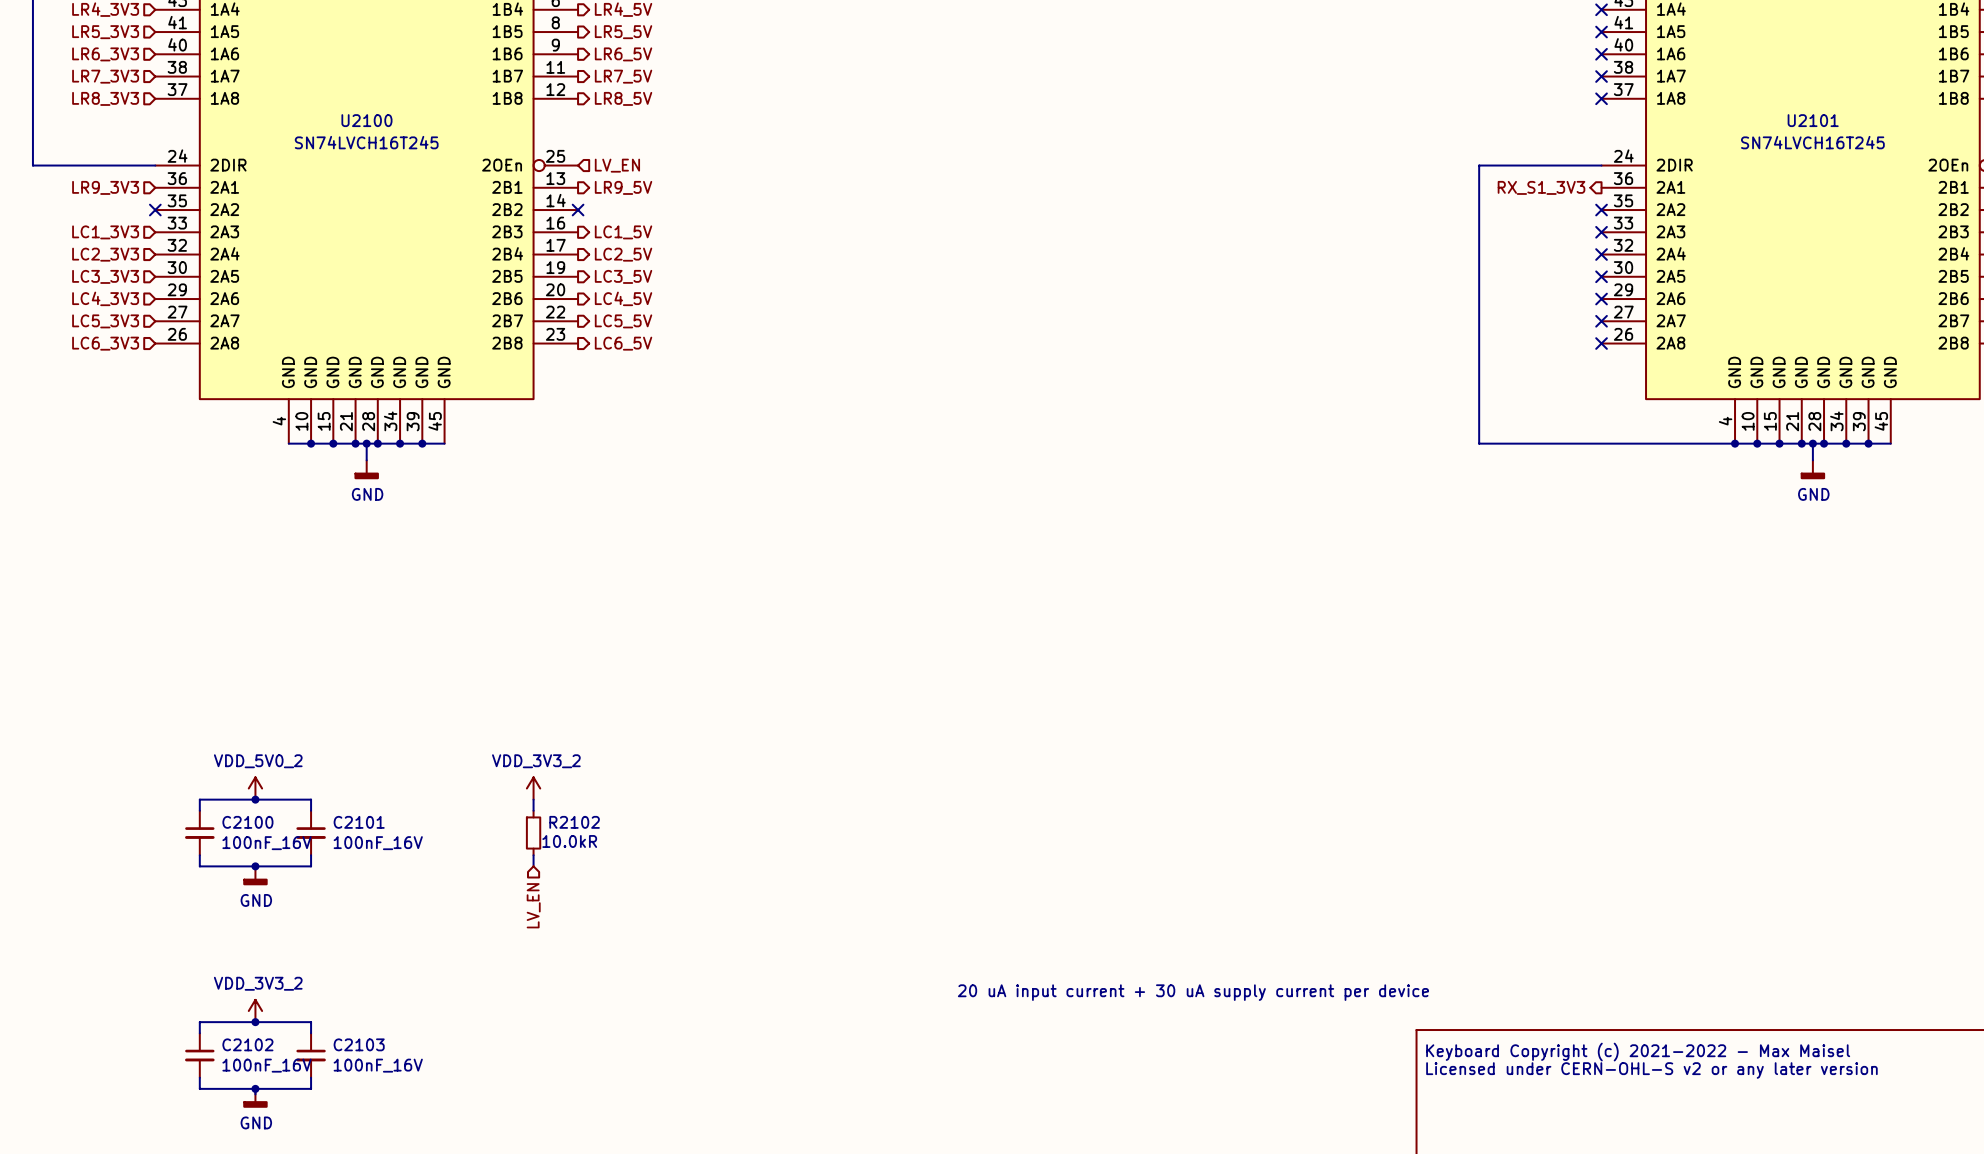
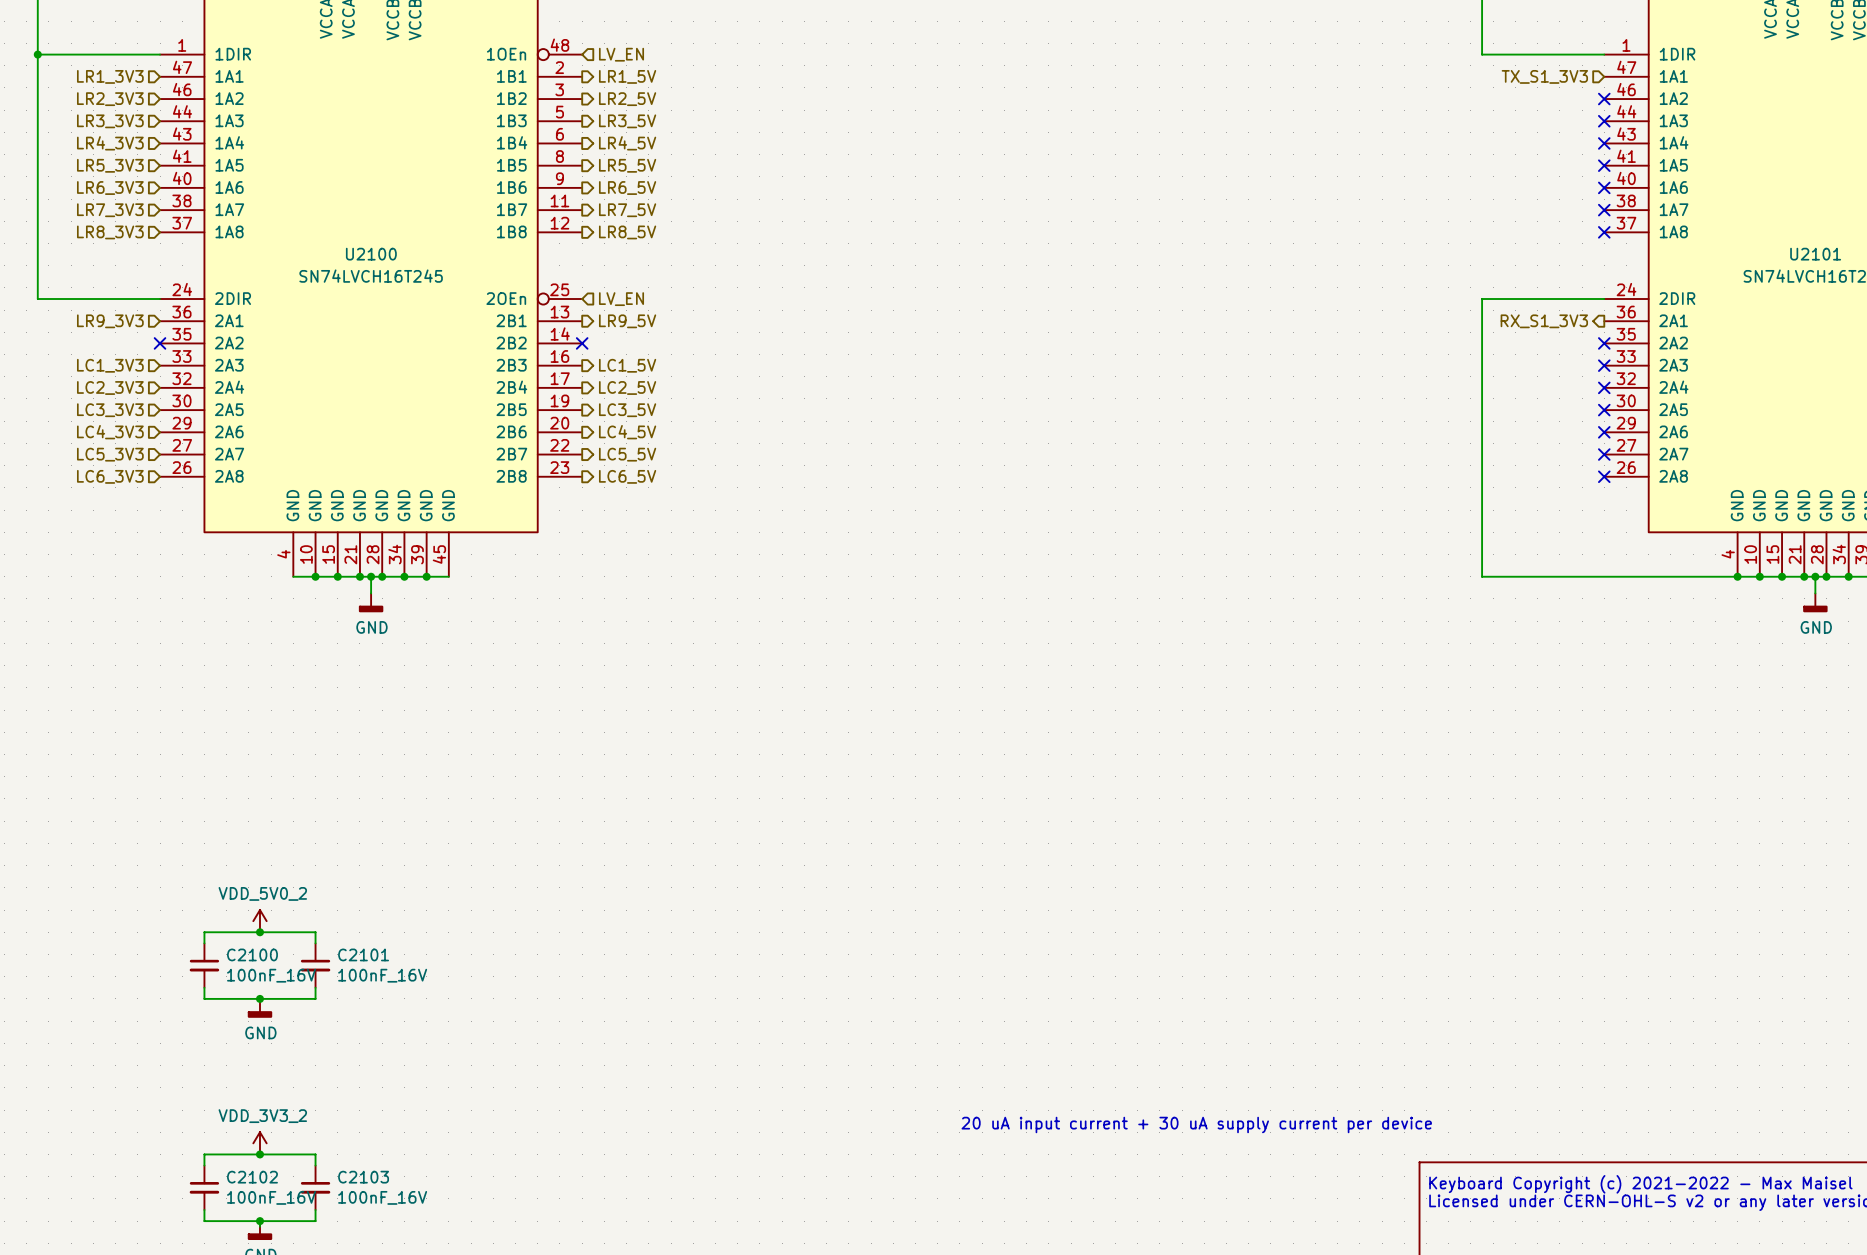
power symbol: VDD_3V3_2 (533, 788) -> none
wire: (533, 799) (533, 810) -> none
R2102: 10.0kR (533, 833) -> none
wire: (533, 855) (533, 866) -> none
hierarchical label: LV_EN (533, 905) -> none

